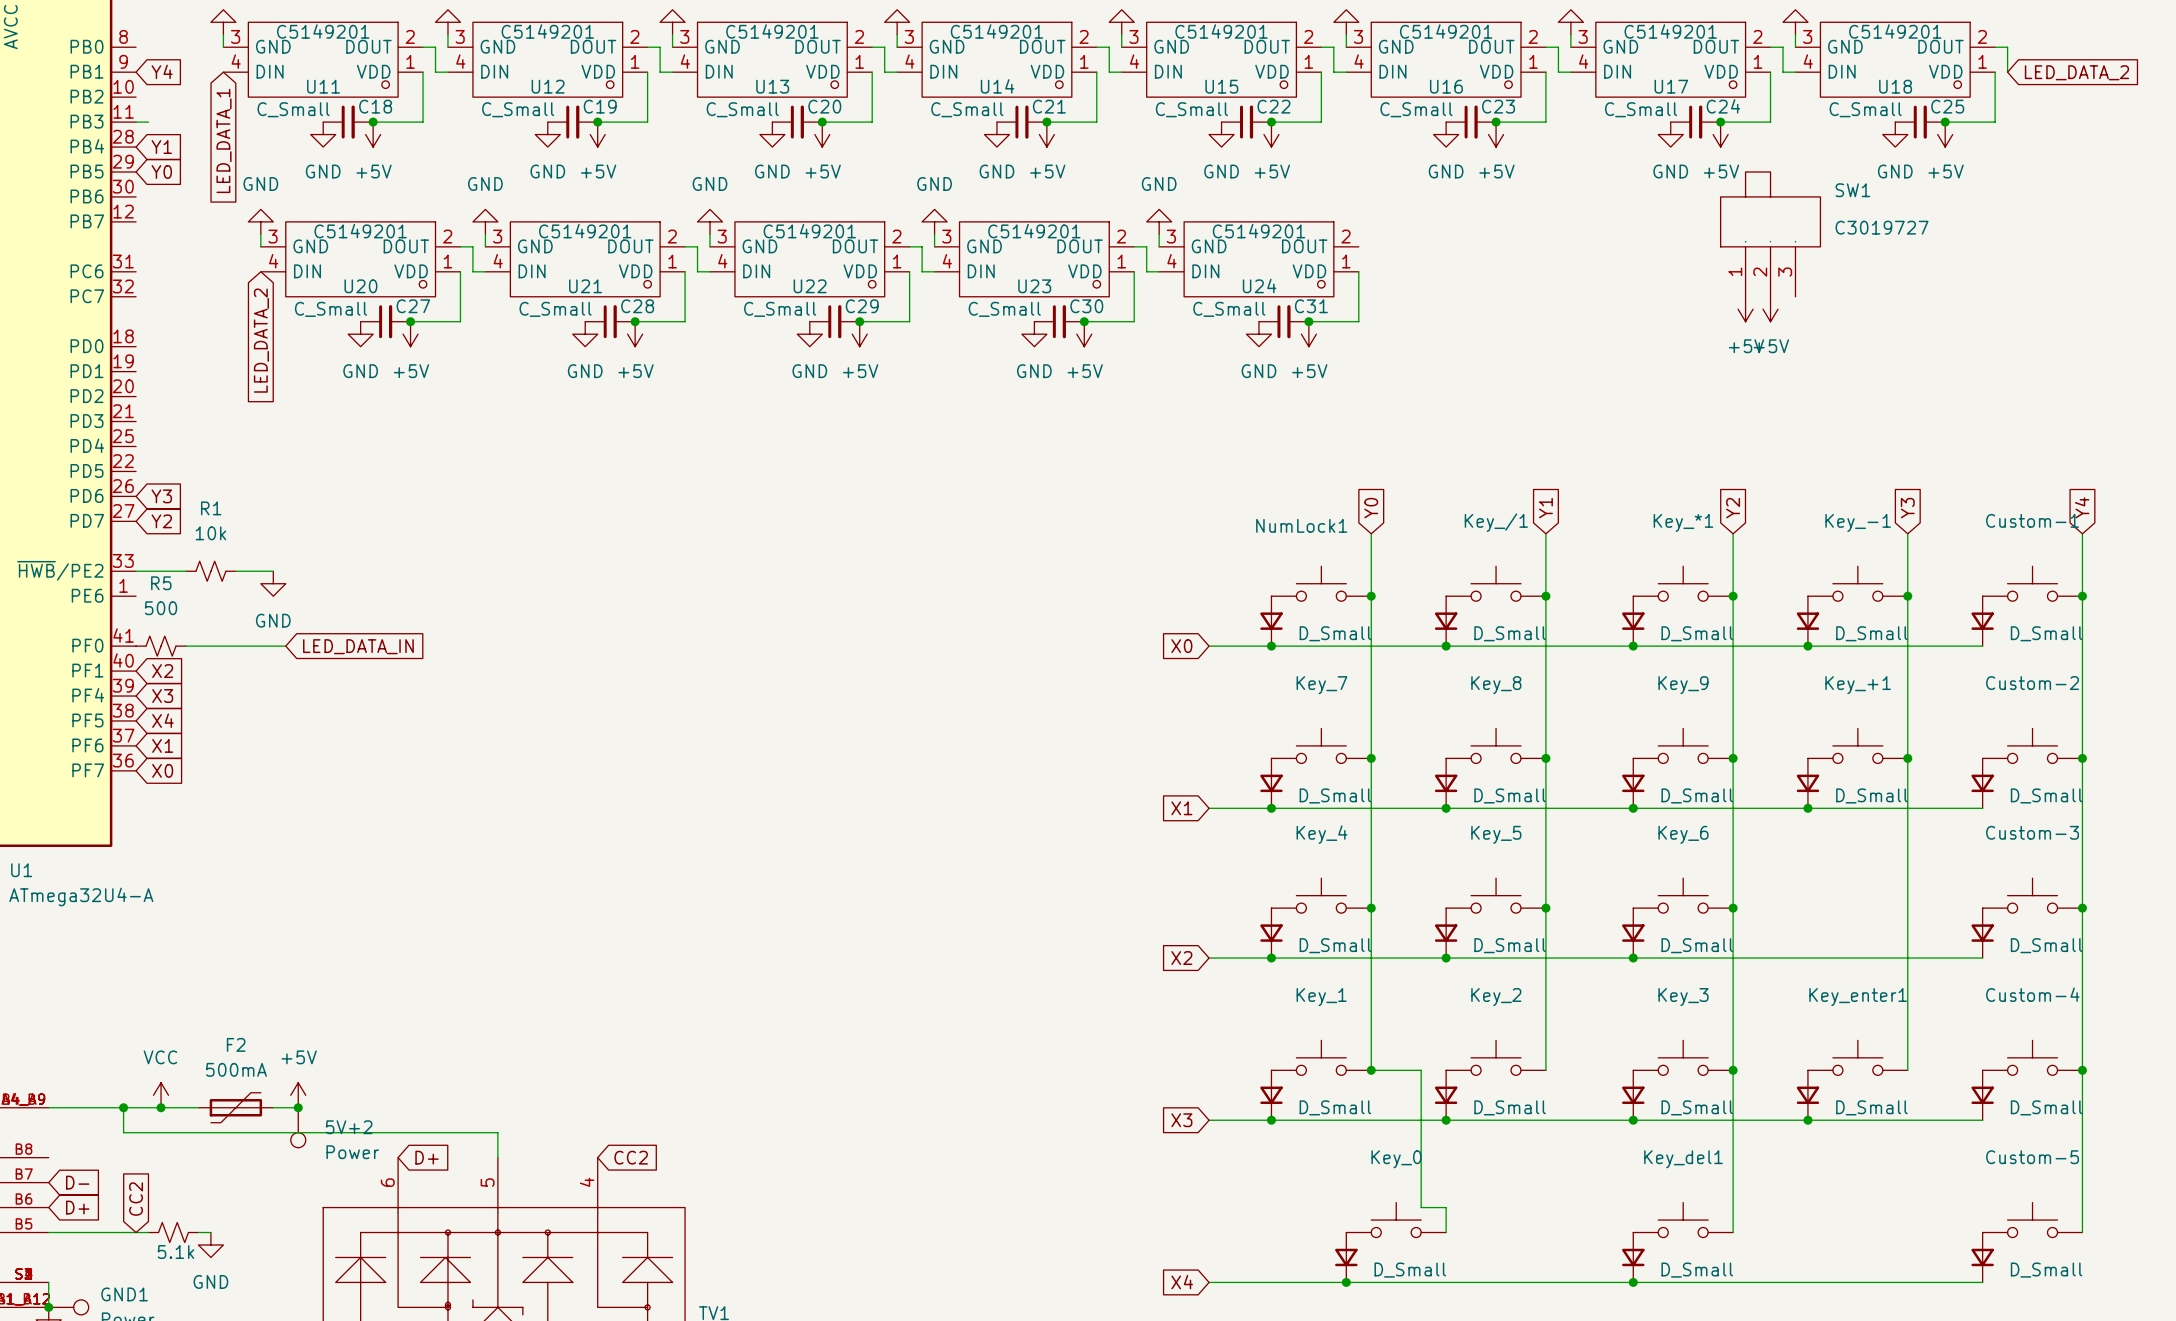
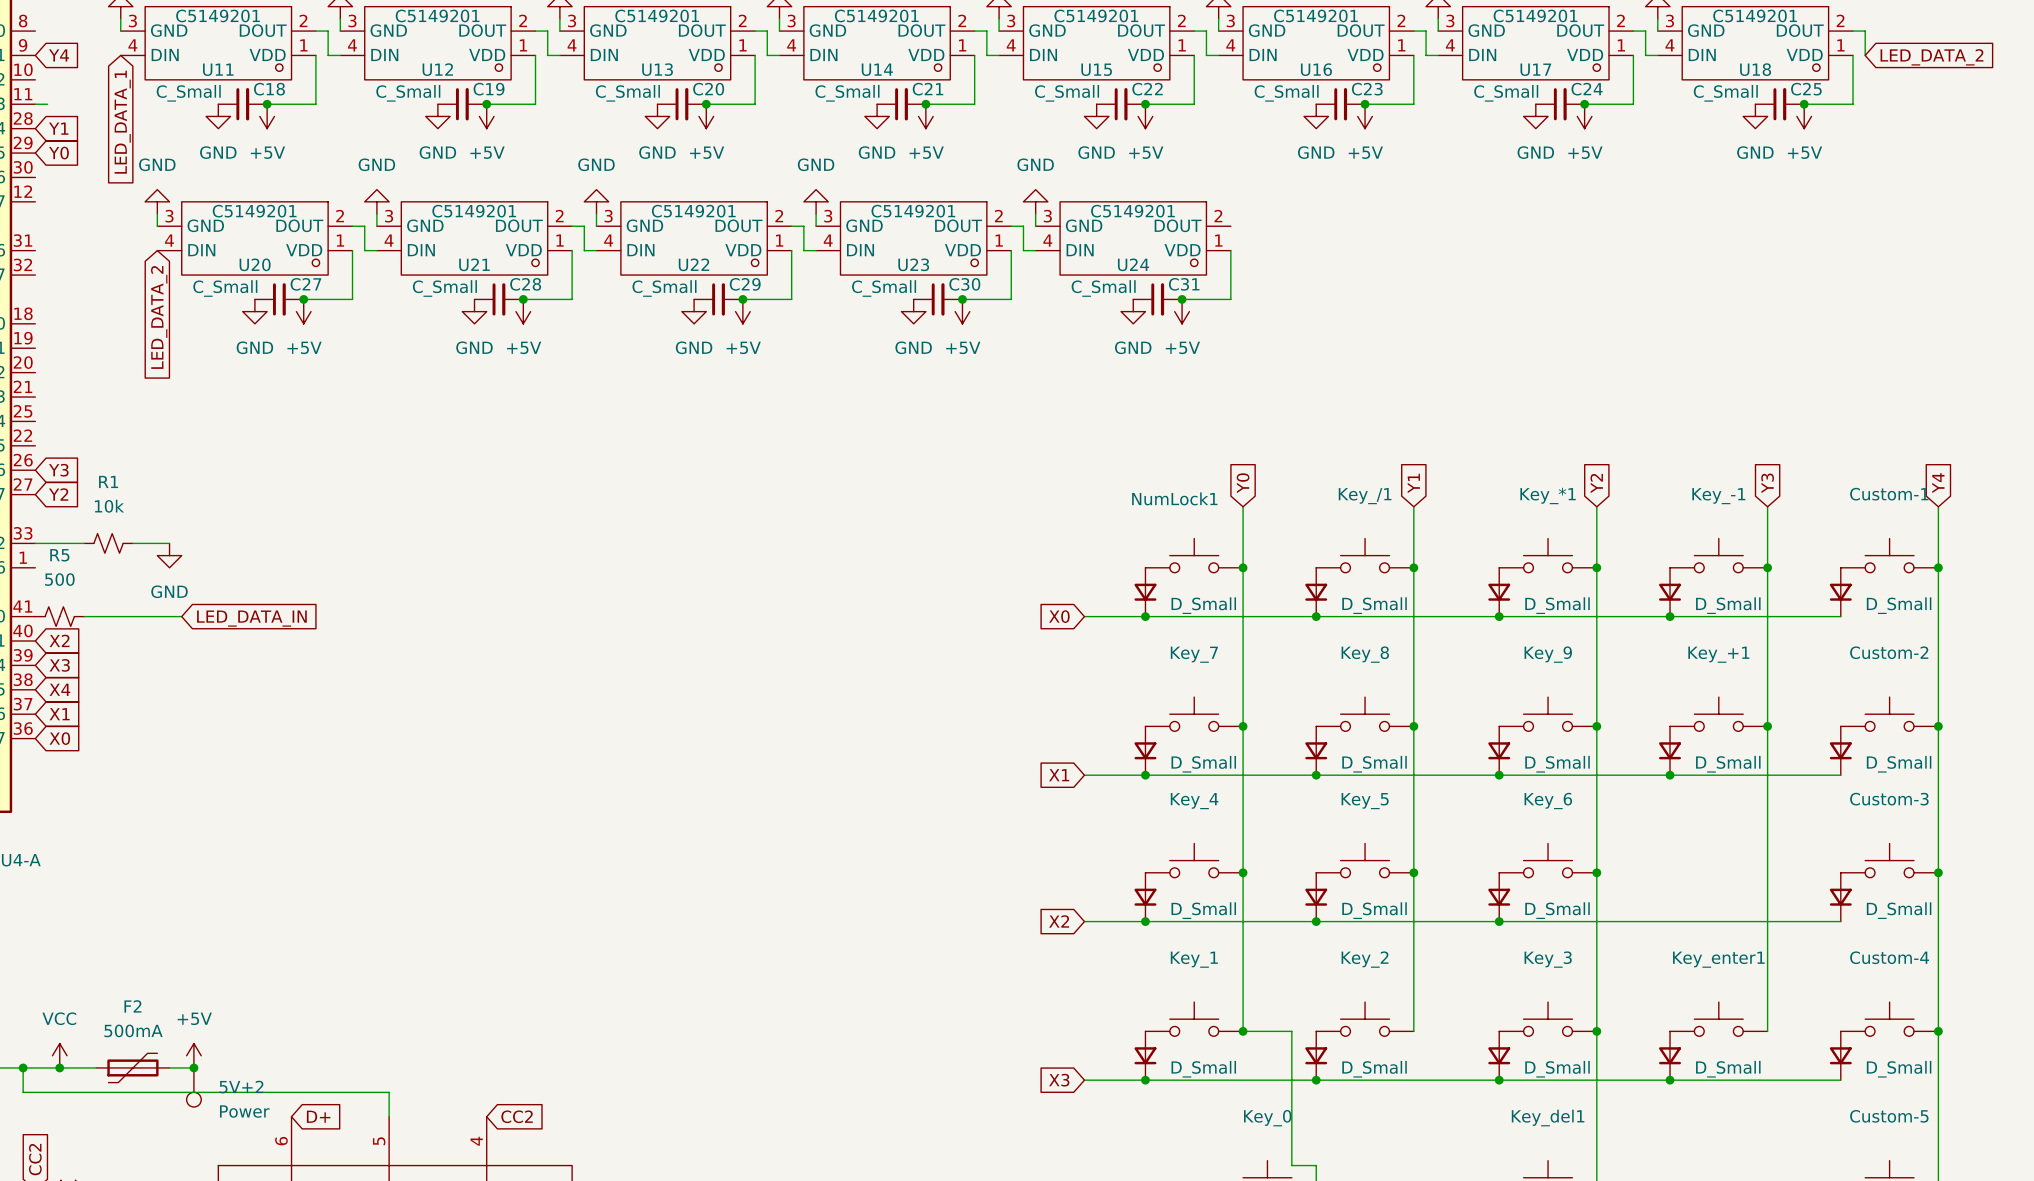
SW1: (1770, 234) -> none
power symbol: +5V (1745, 309) -> none
power symbol: +5V (1770, 309) -> none

